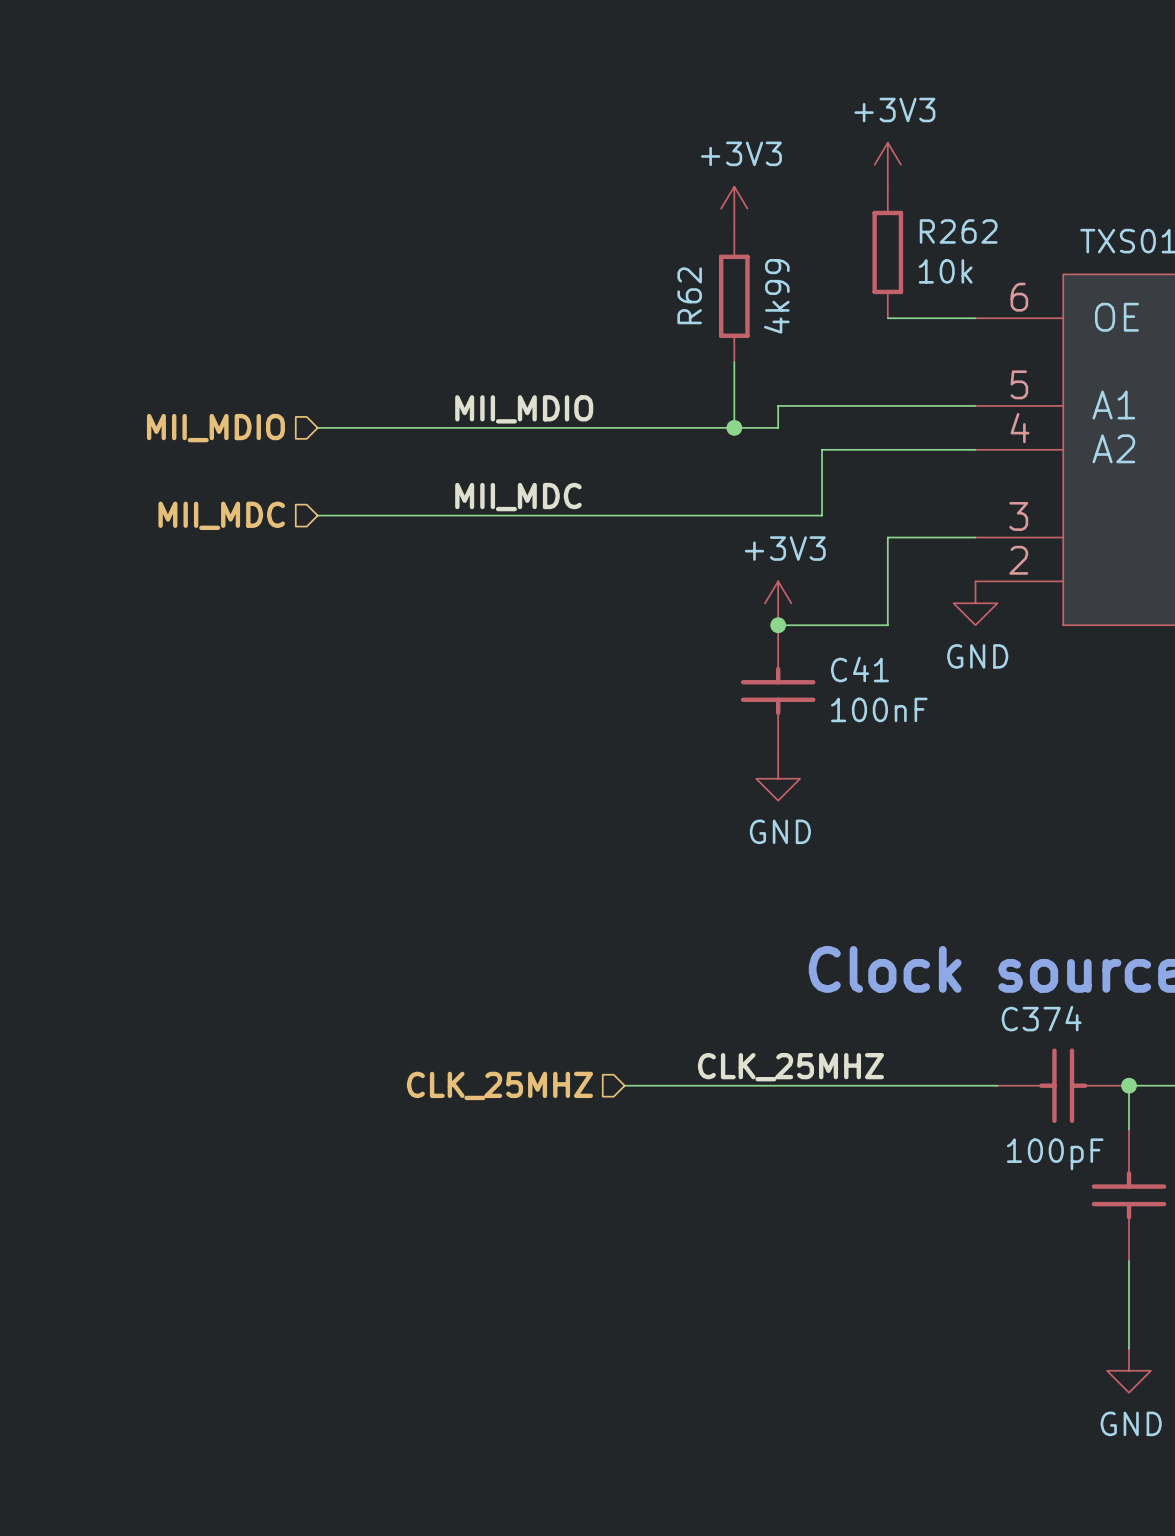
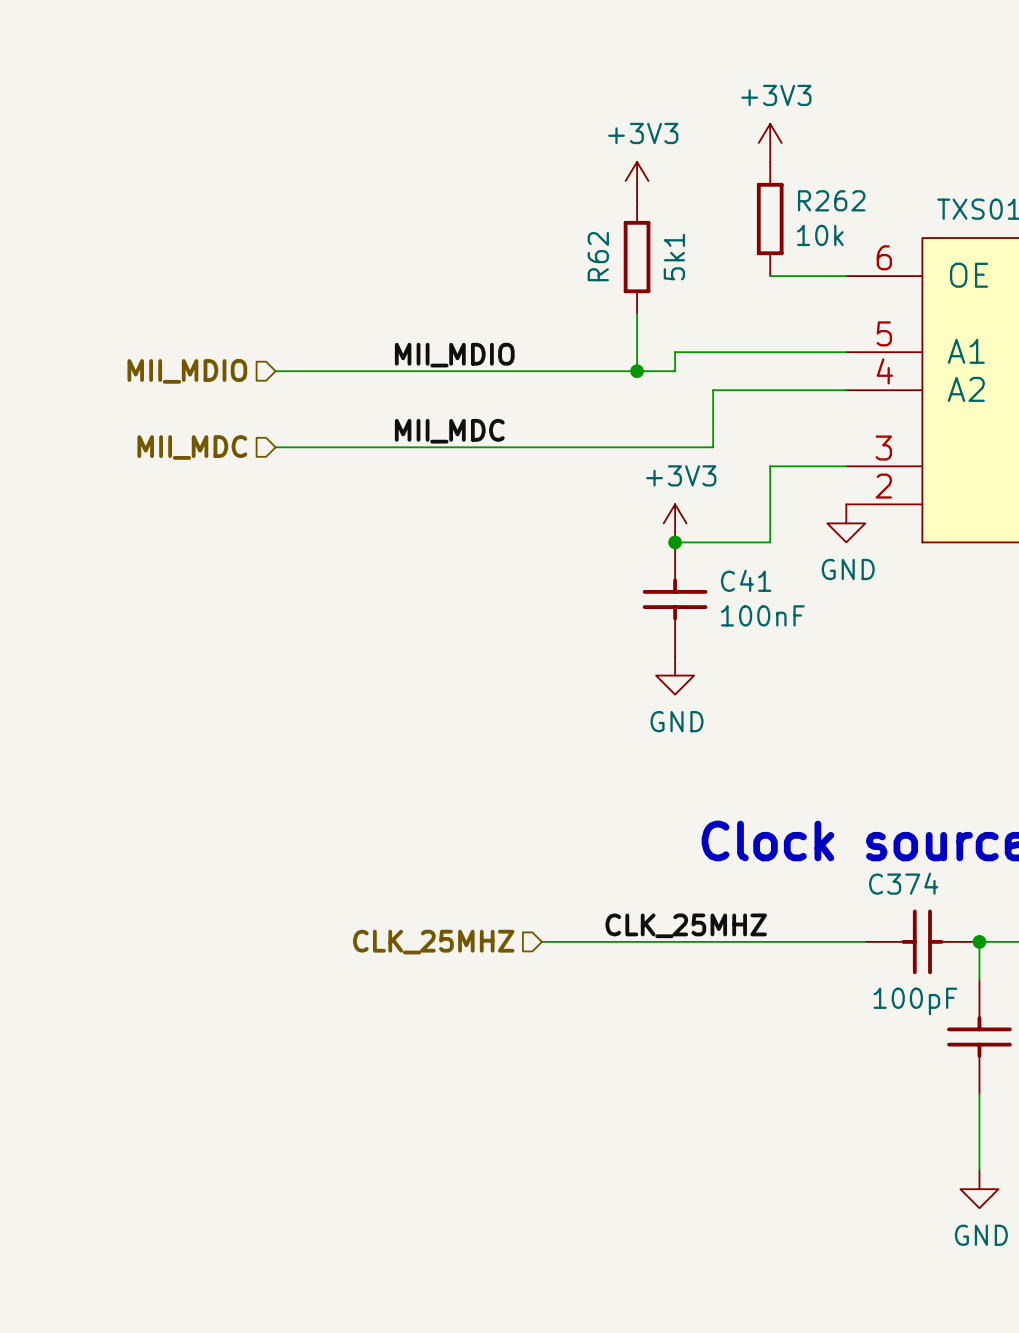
R62 text: 4k99 (776, 296) -> none
R62 text: none -> 5k1 (674, 257)

